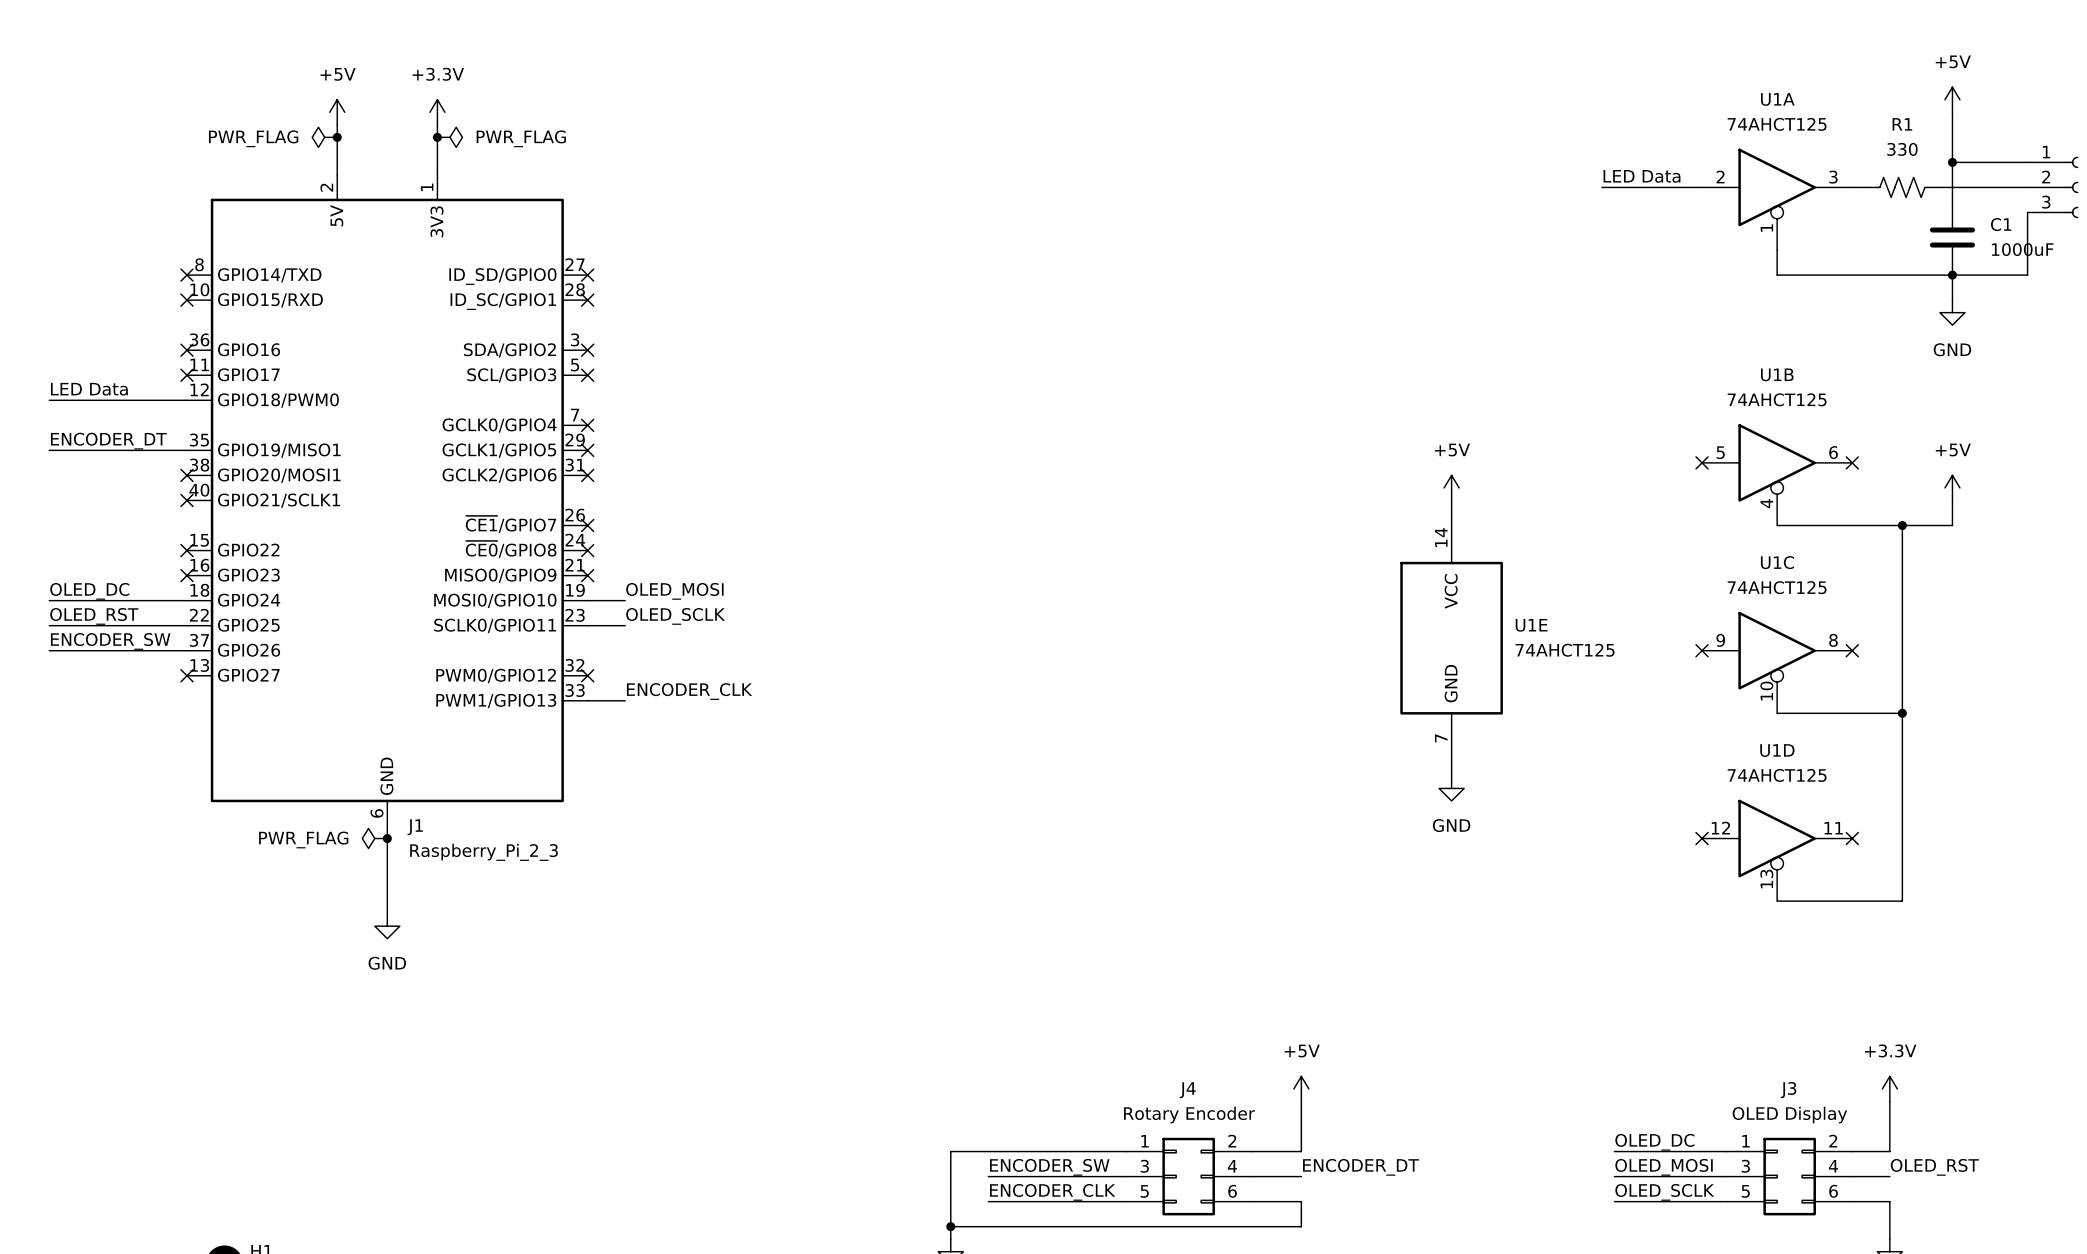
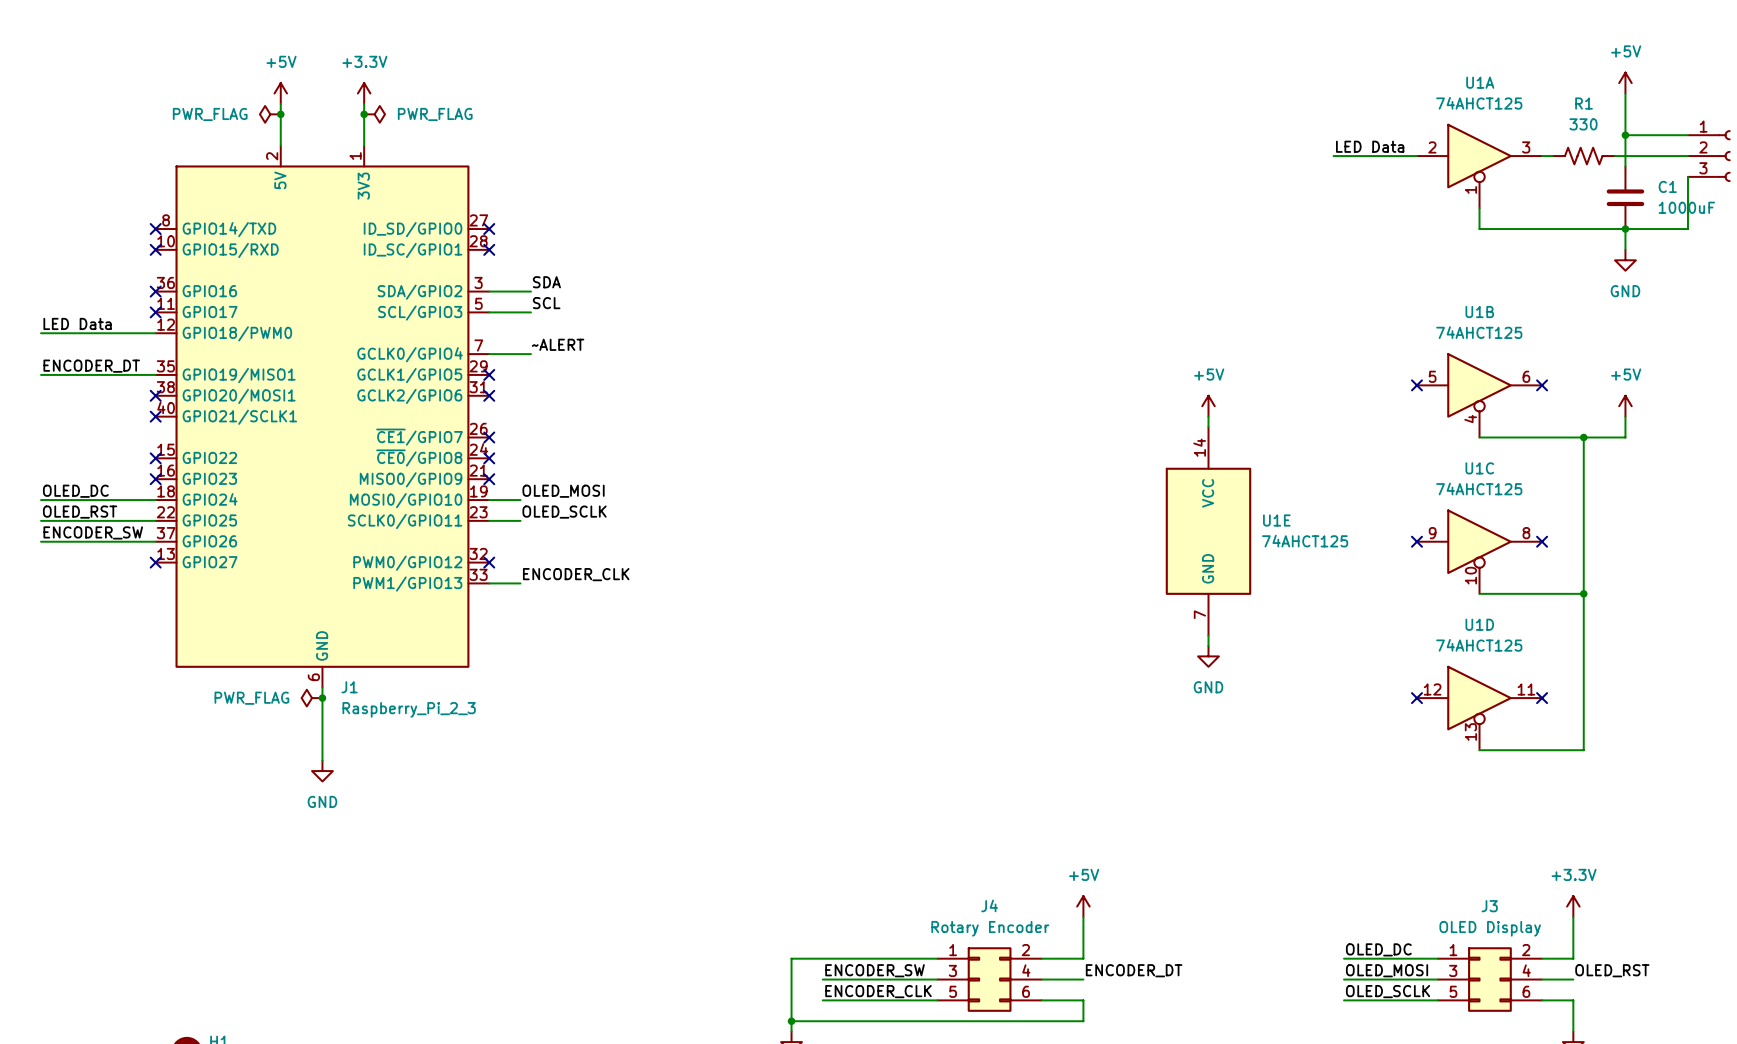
label: none -> SDA (546, 282)
wire: none -> (489, 291) (530, 291)
no-connect mark: (587, 350) -> none
label: none -> SCL (546, 303)
wire: none -> (489, 312) (530, 312)
no-connect mark: (587, 375) -> none
label: none -> ~ALERT (558, 344)
wire: none -> (489, 354) (530, 354)
no-connect mark: (587, 425) -> none

